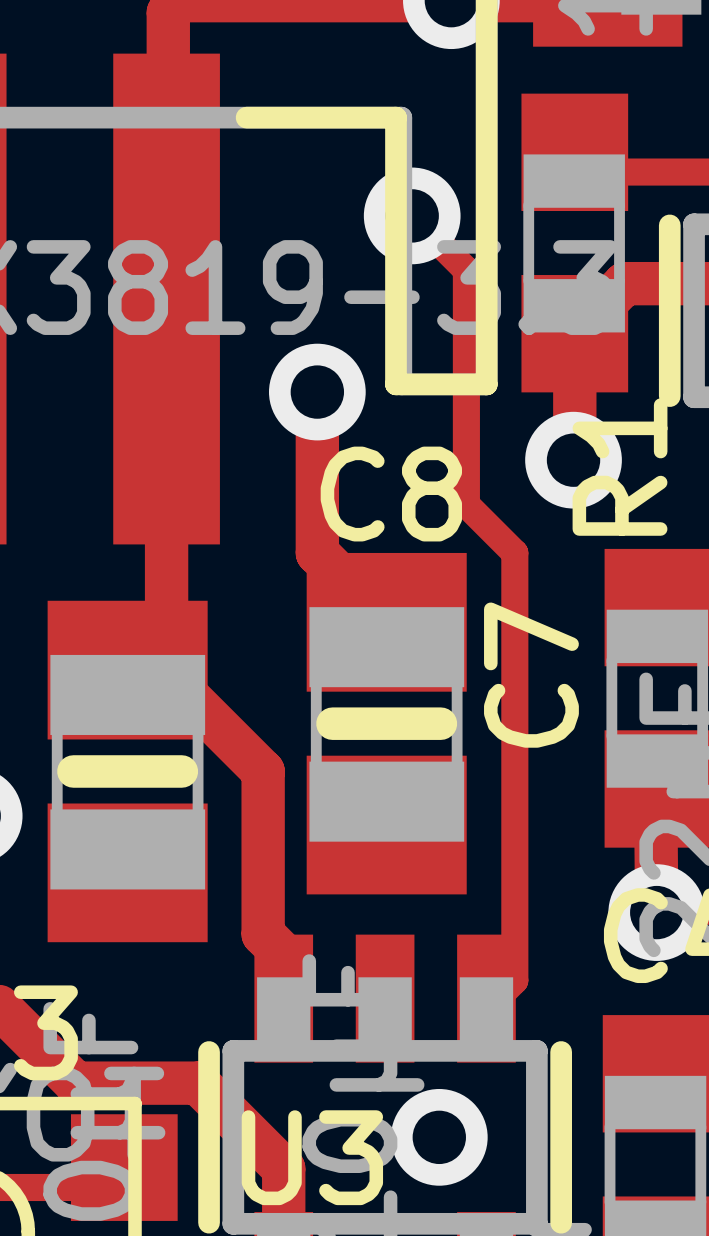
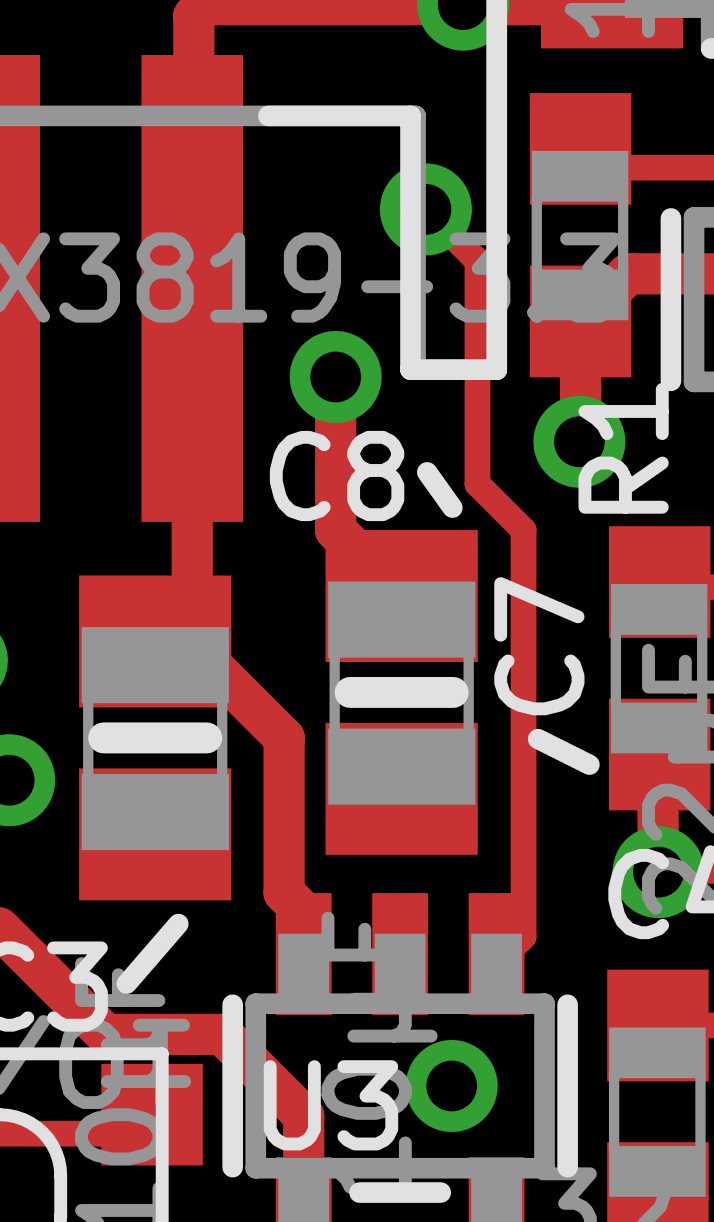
line: none -> (427, 472) (452, 507)
C8 name position: C8 (391, 494) -> C8 (337, 476)
line: none -> (537, 738) (589, 764)
line: none -> (178, 923) (126, 983)

